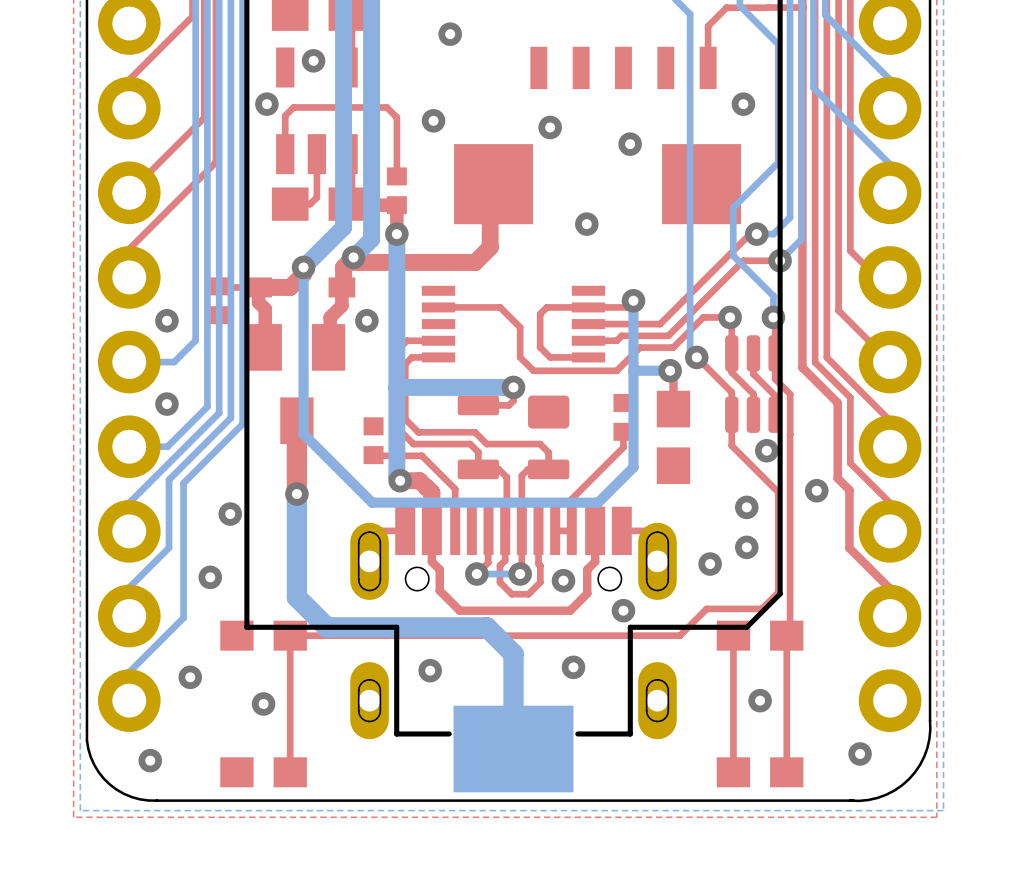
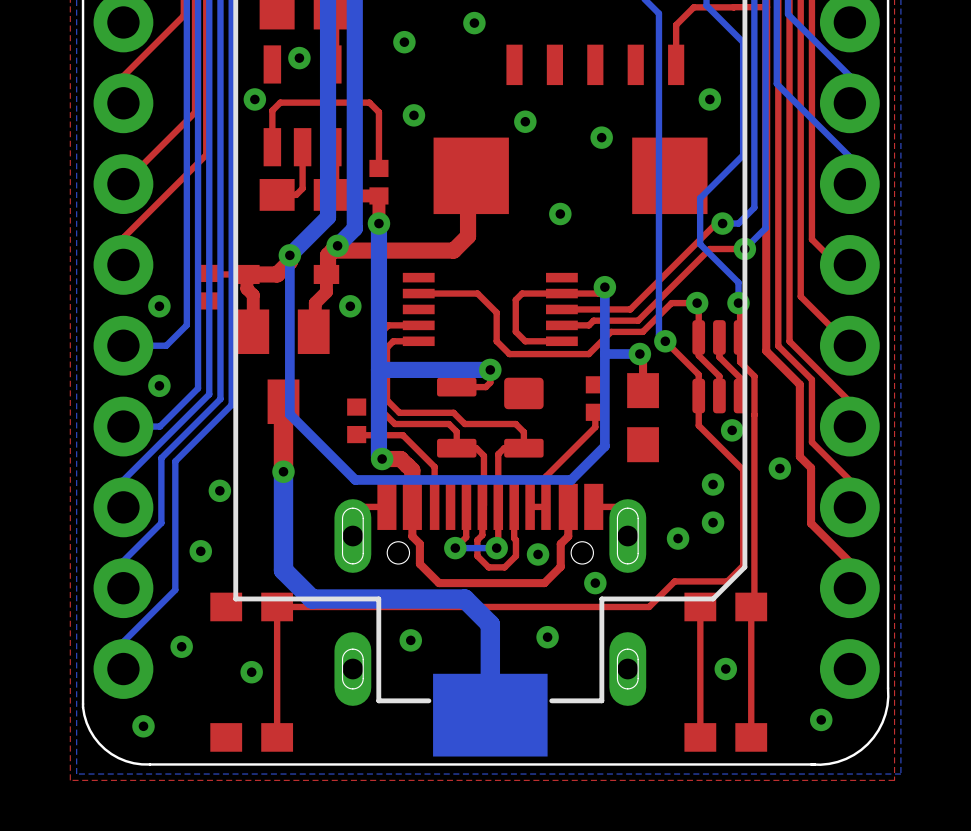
via: none -> (474, 23)
via: (450, 34) -> none
via: none -> (404, 42)

